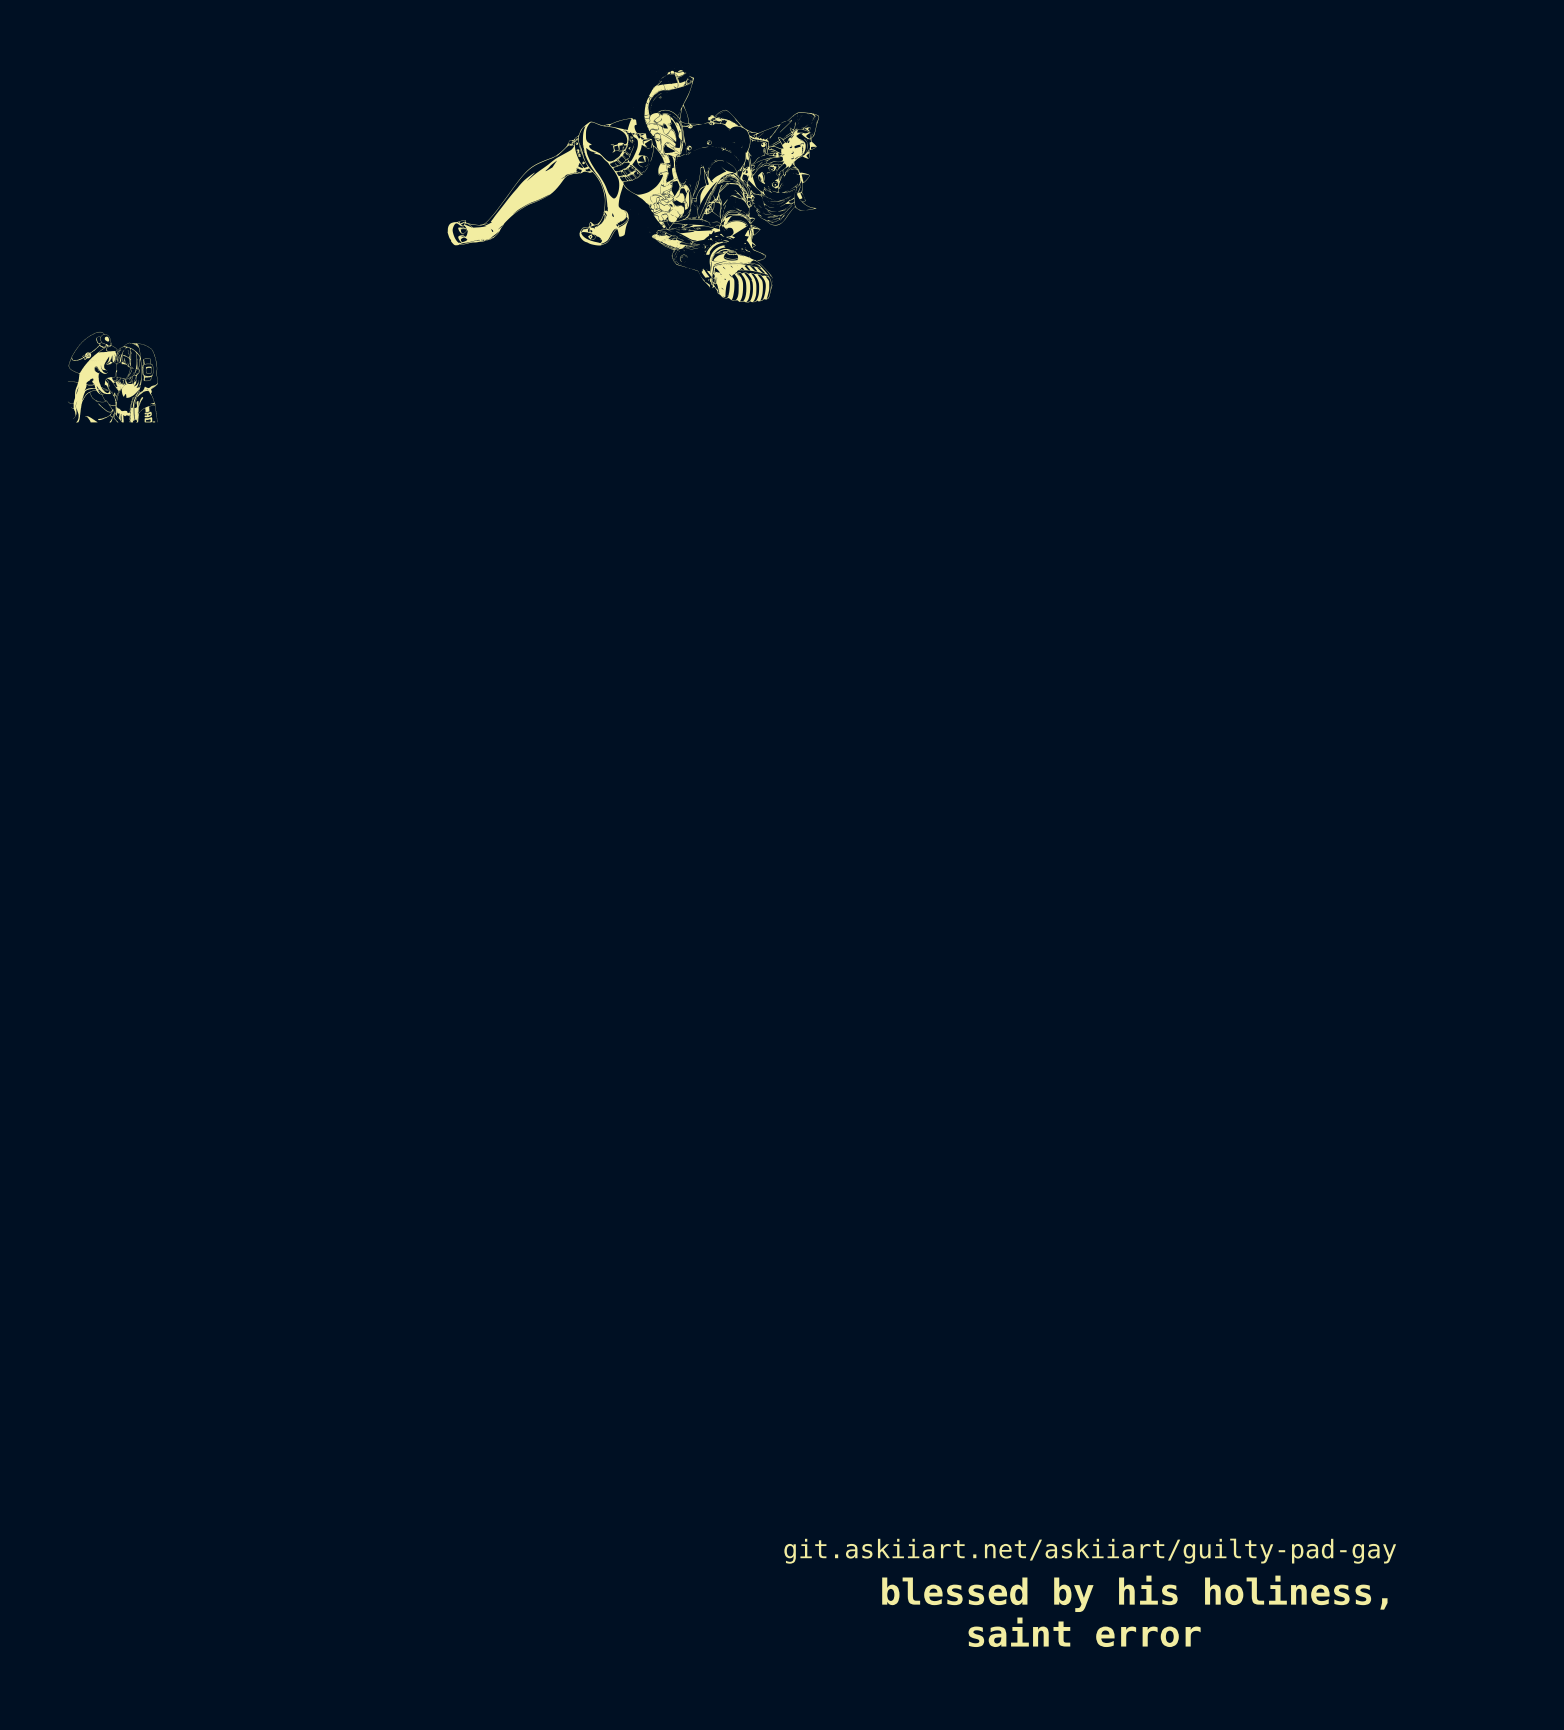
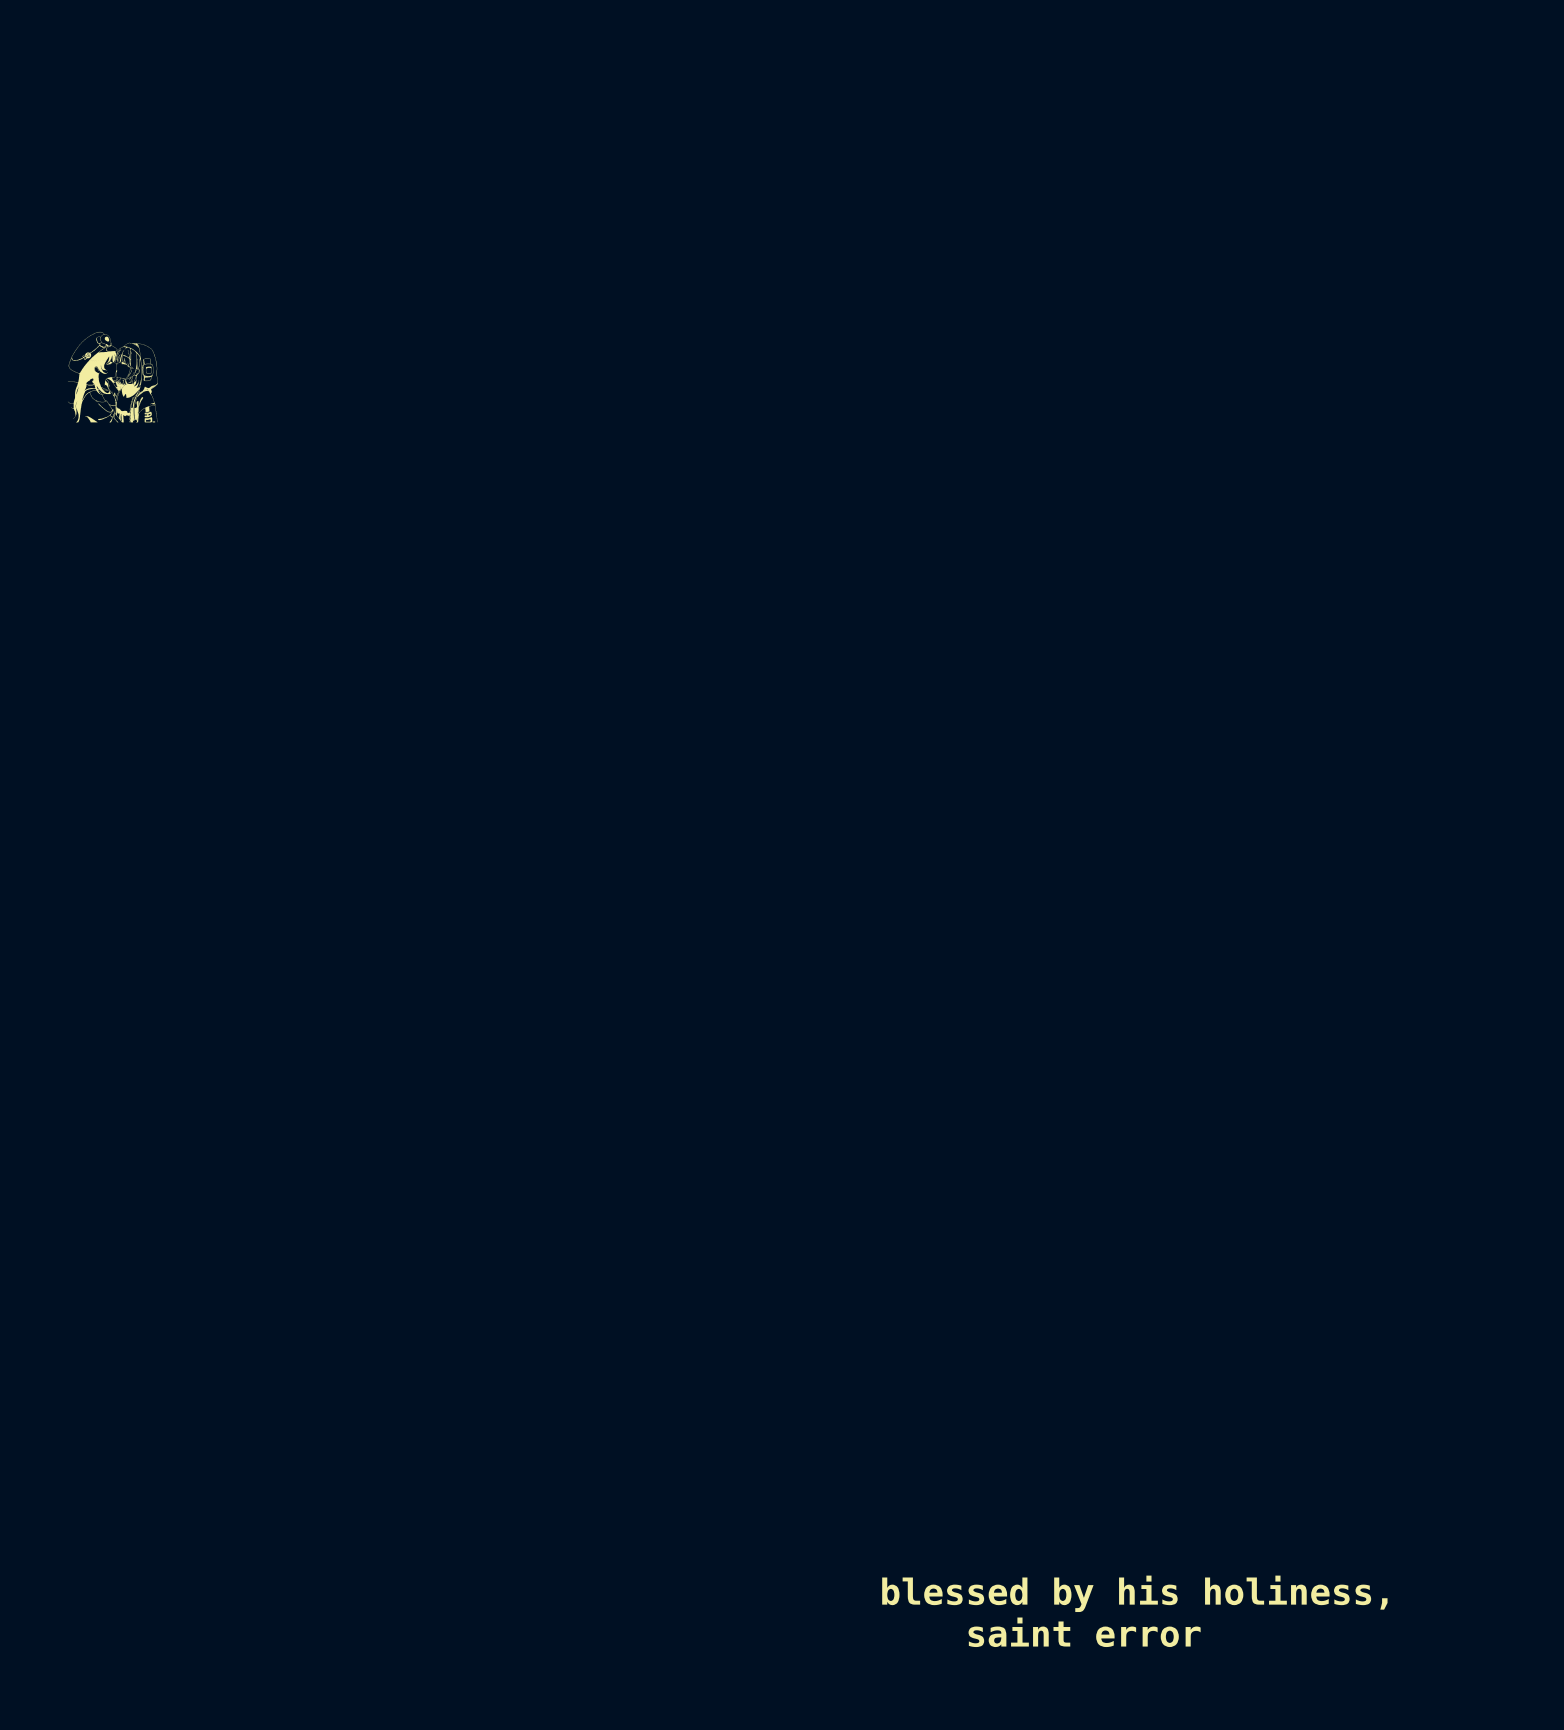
drawing: [447, 67, 820, 303] -> none
text: git.askiiart.net/askiiart/guilty-pad-gay (1090, 1551) -> none

